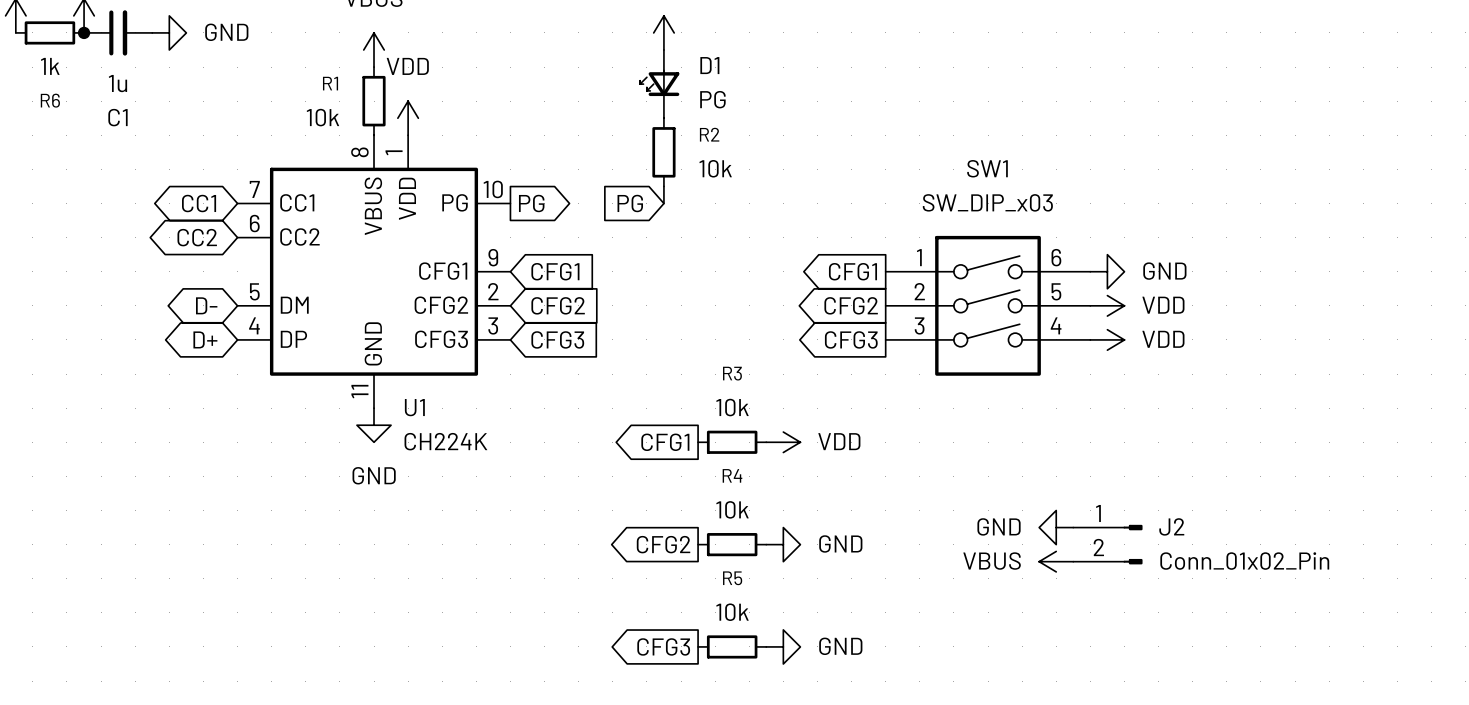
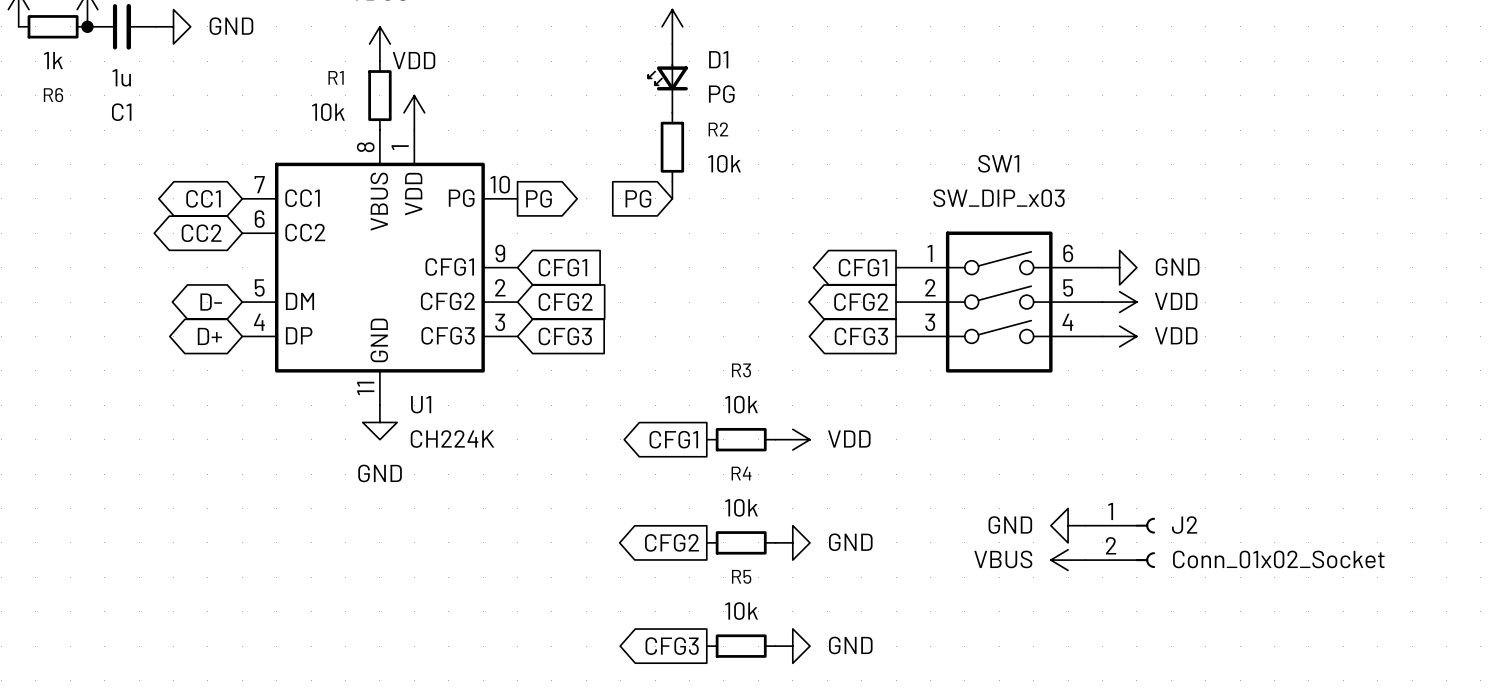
J2 symbol: [1073, 524, 1143, 565] -> [1085, 517, 1156, 569]
J2 value: Conn_01x02_Pin (1244, 561) -> Conn_01x02_Socket (1278, 559)

